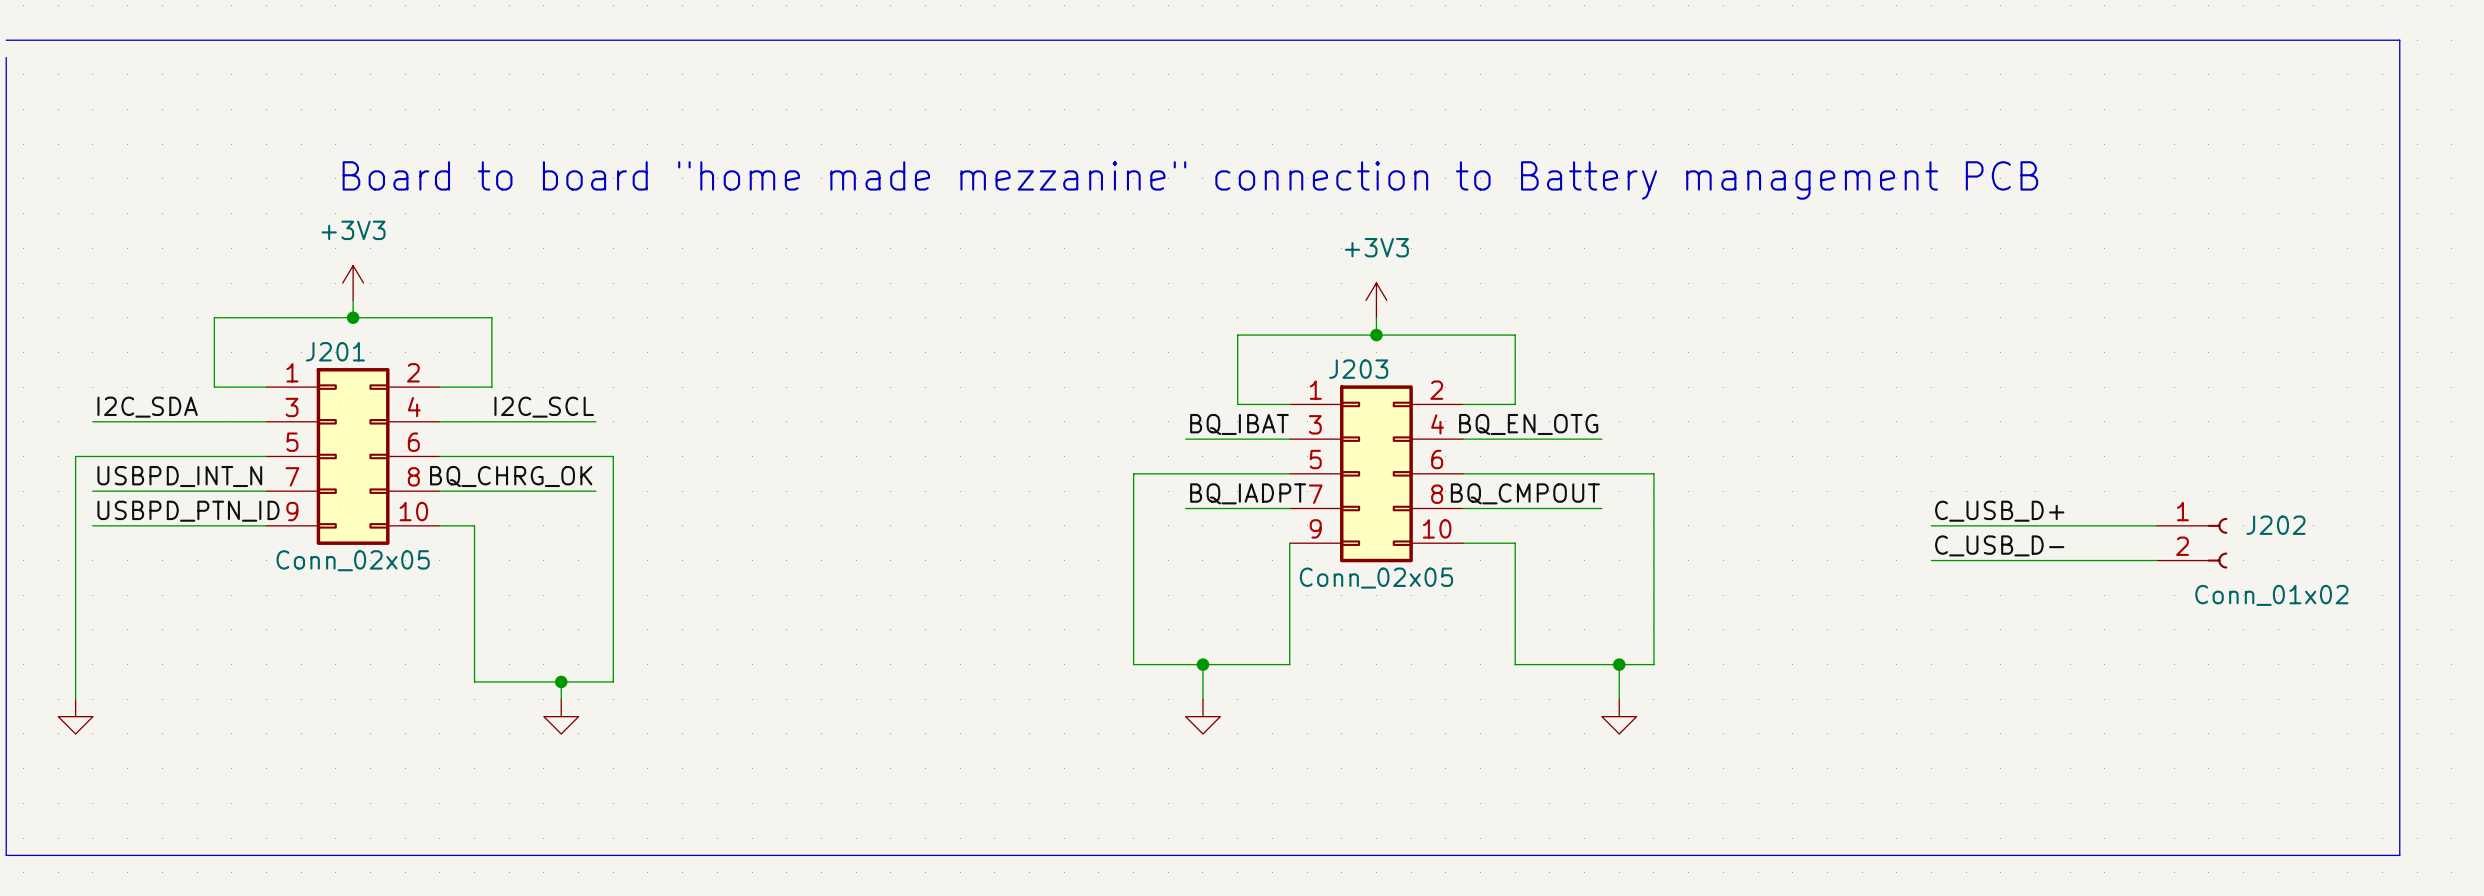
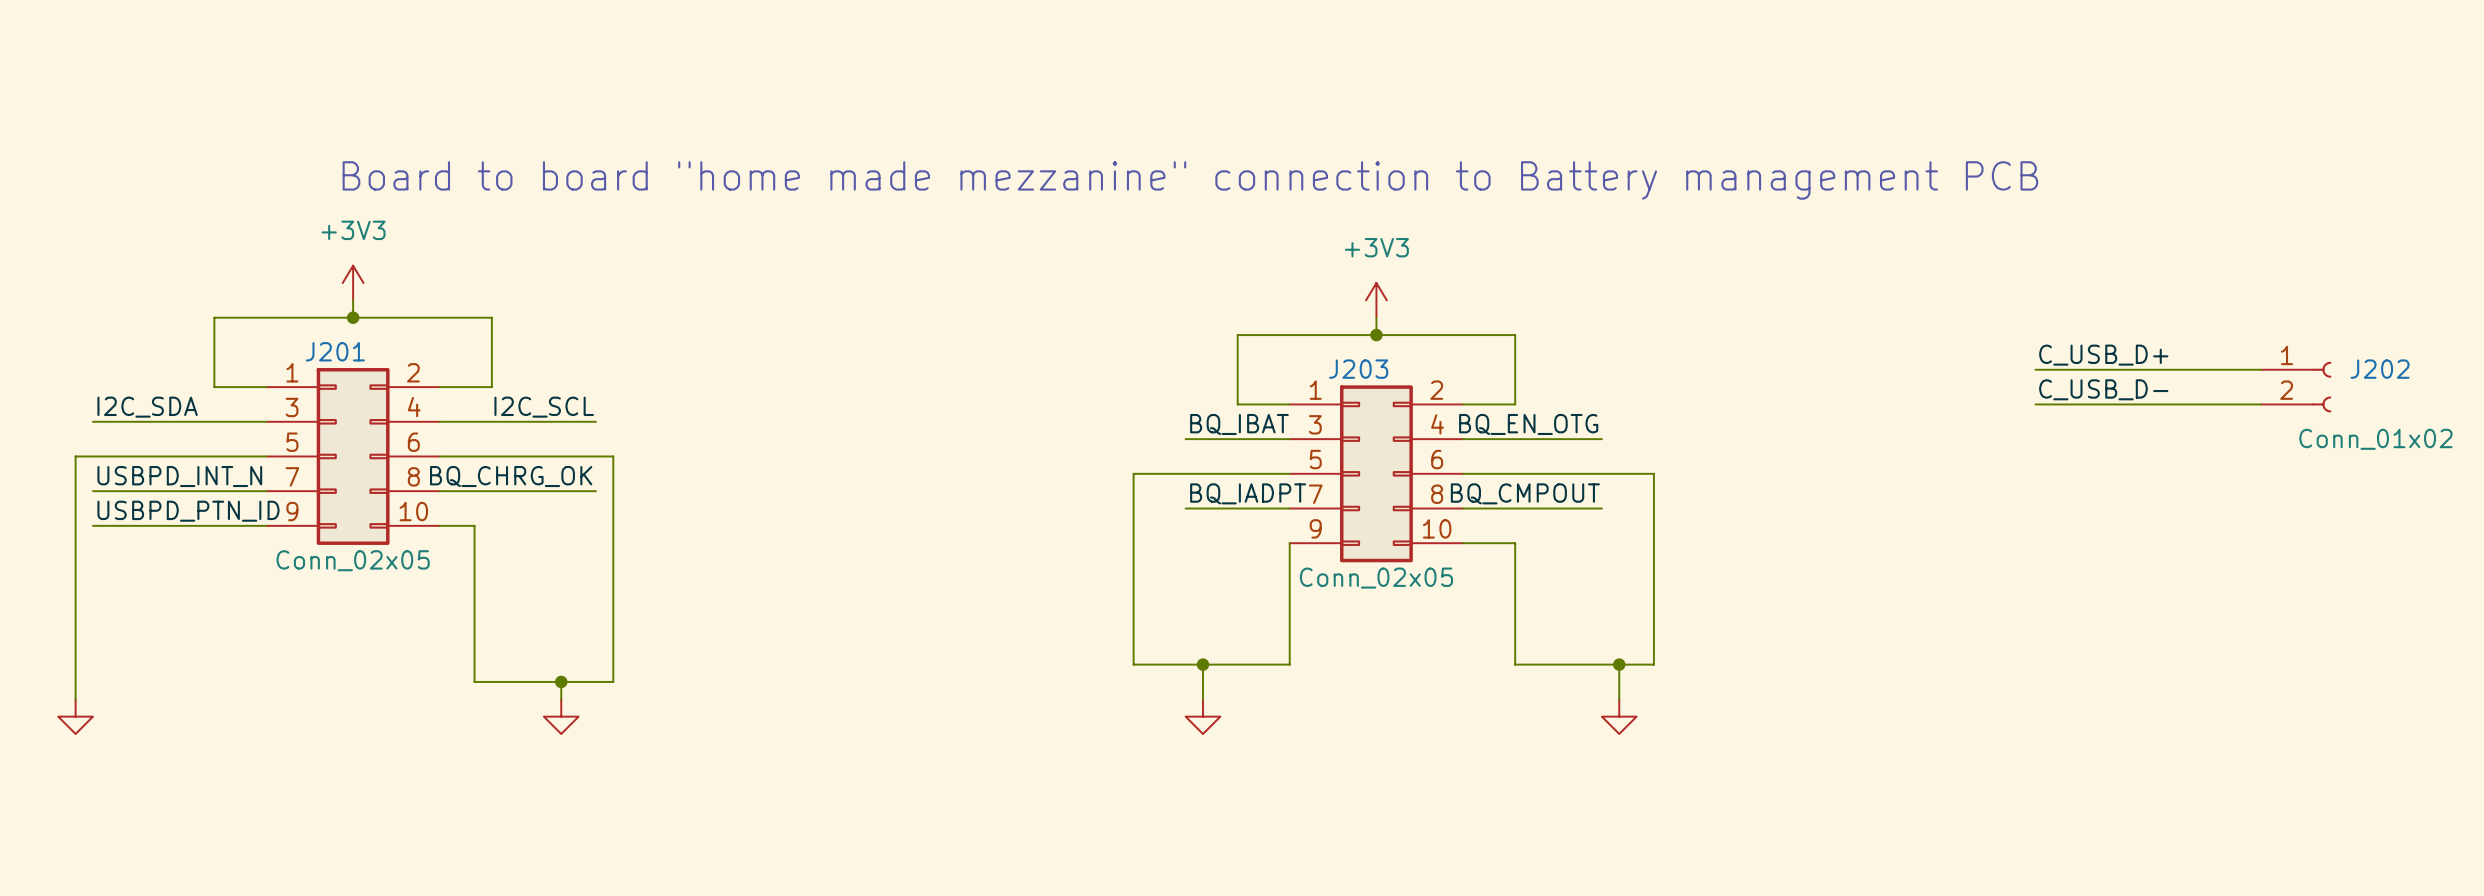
line: (6, 40) (2399, 40) (2399, 855) (6, 855) (6, 57) -> none
label position: C_USB_D+ (1999, 511) -> C_USB_D+ (2103, 355)
wire: (1931, 525) (2156, 525) -> (2035, 369) (2260, 369)
J202 position: (2192, 543) -> (2296, 387)
label position: C_USB_D- (1999, 545) -> C_USB_D- (2103, 389)
wire: (1931, 560) (2156, 560) -> (2035, 404) (2260, 404)

